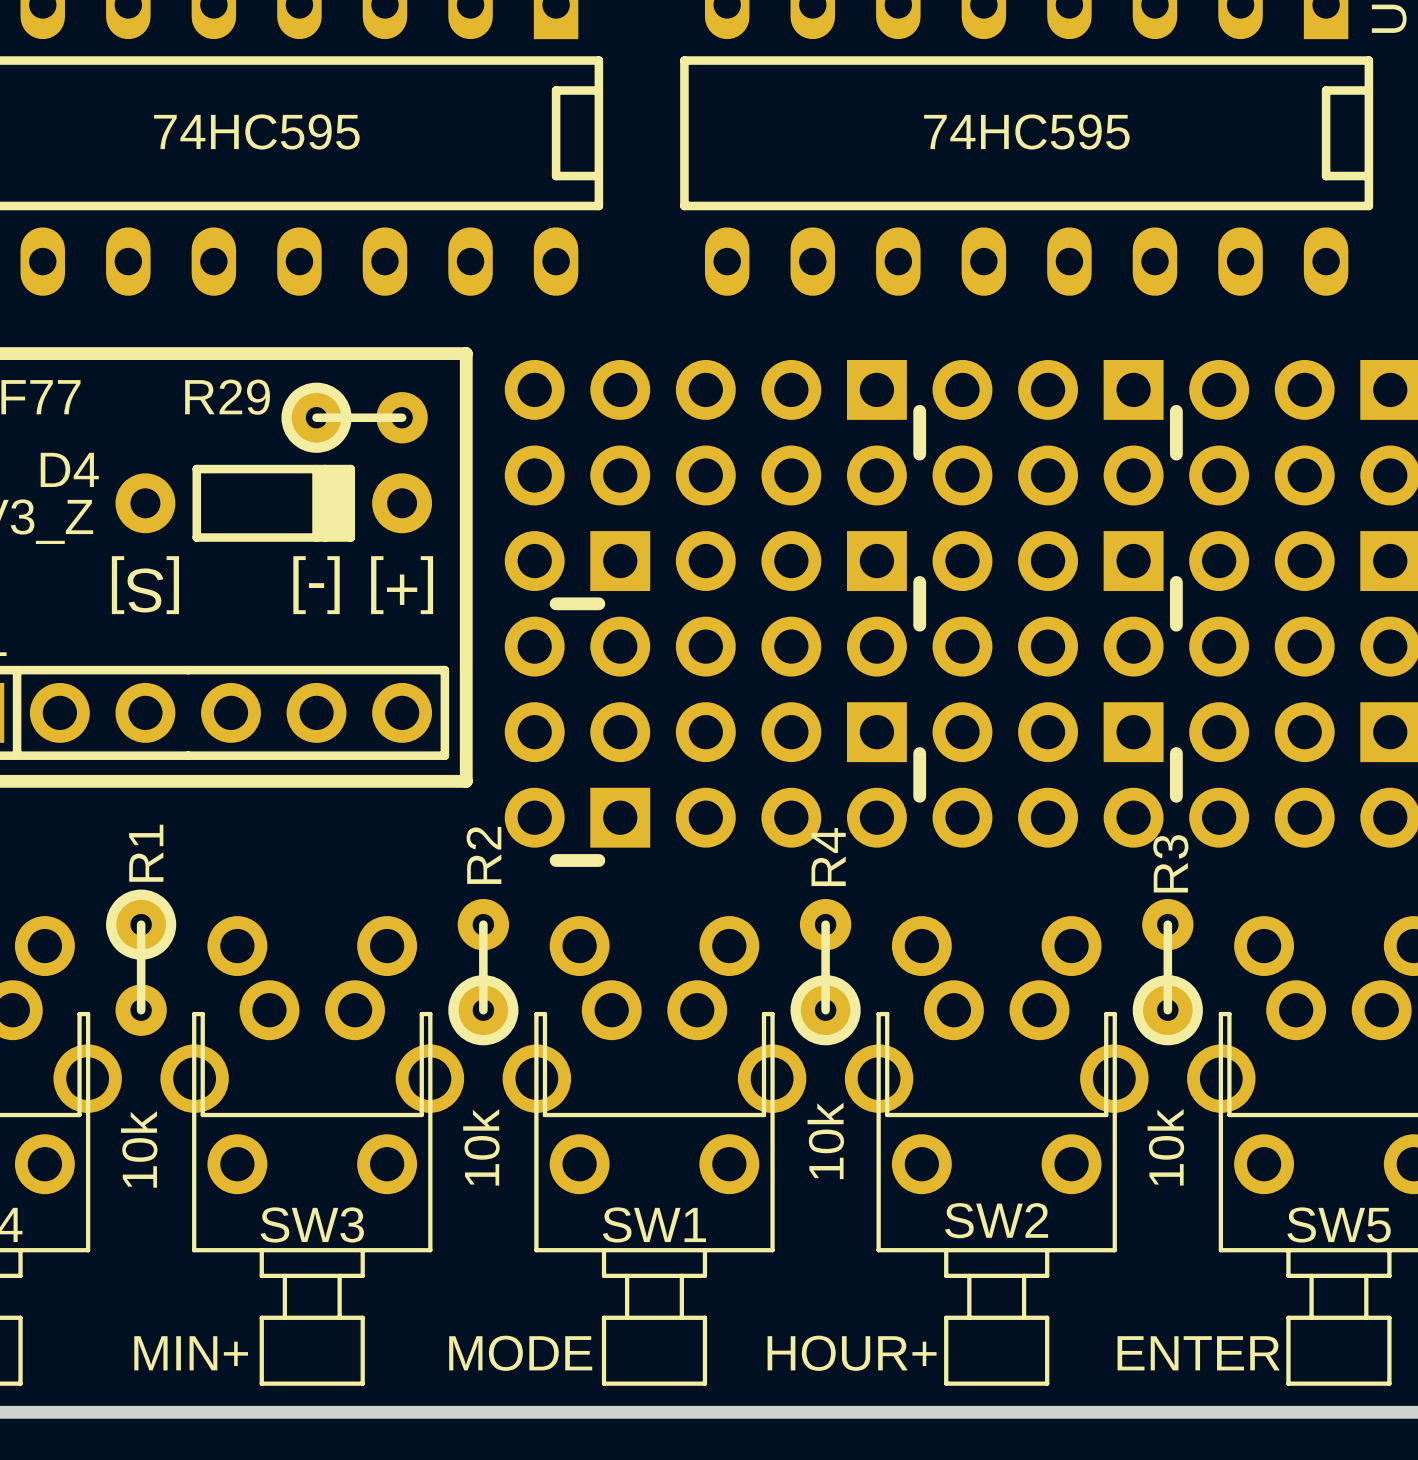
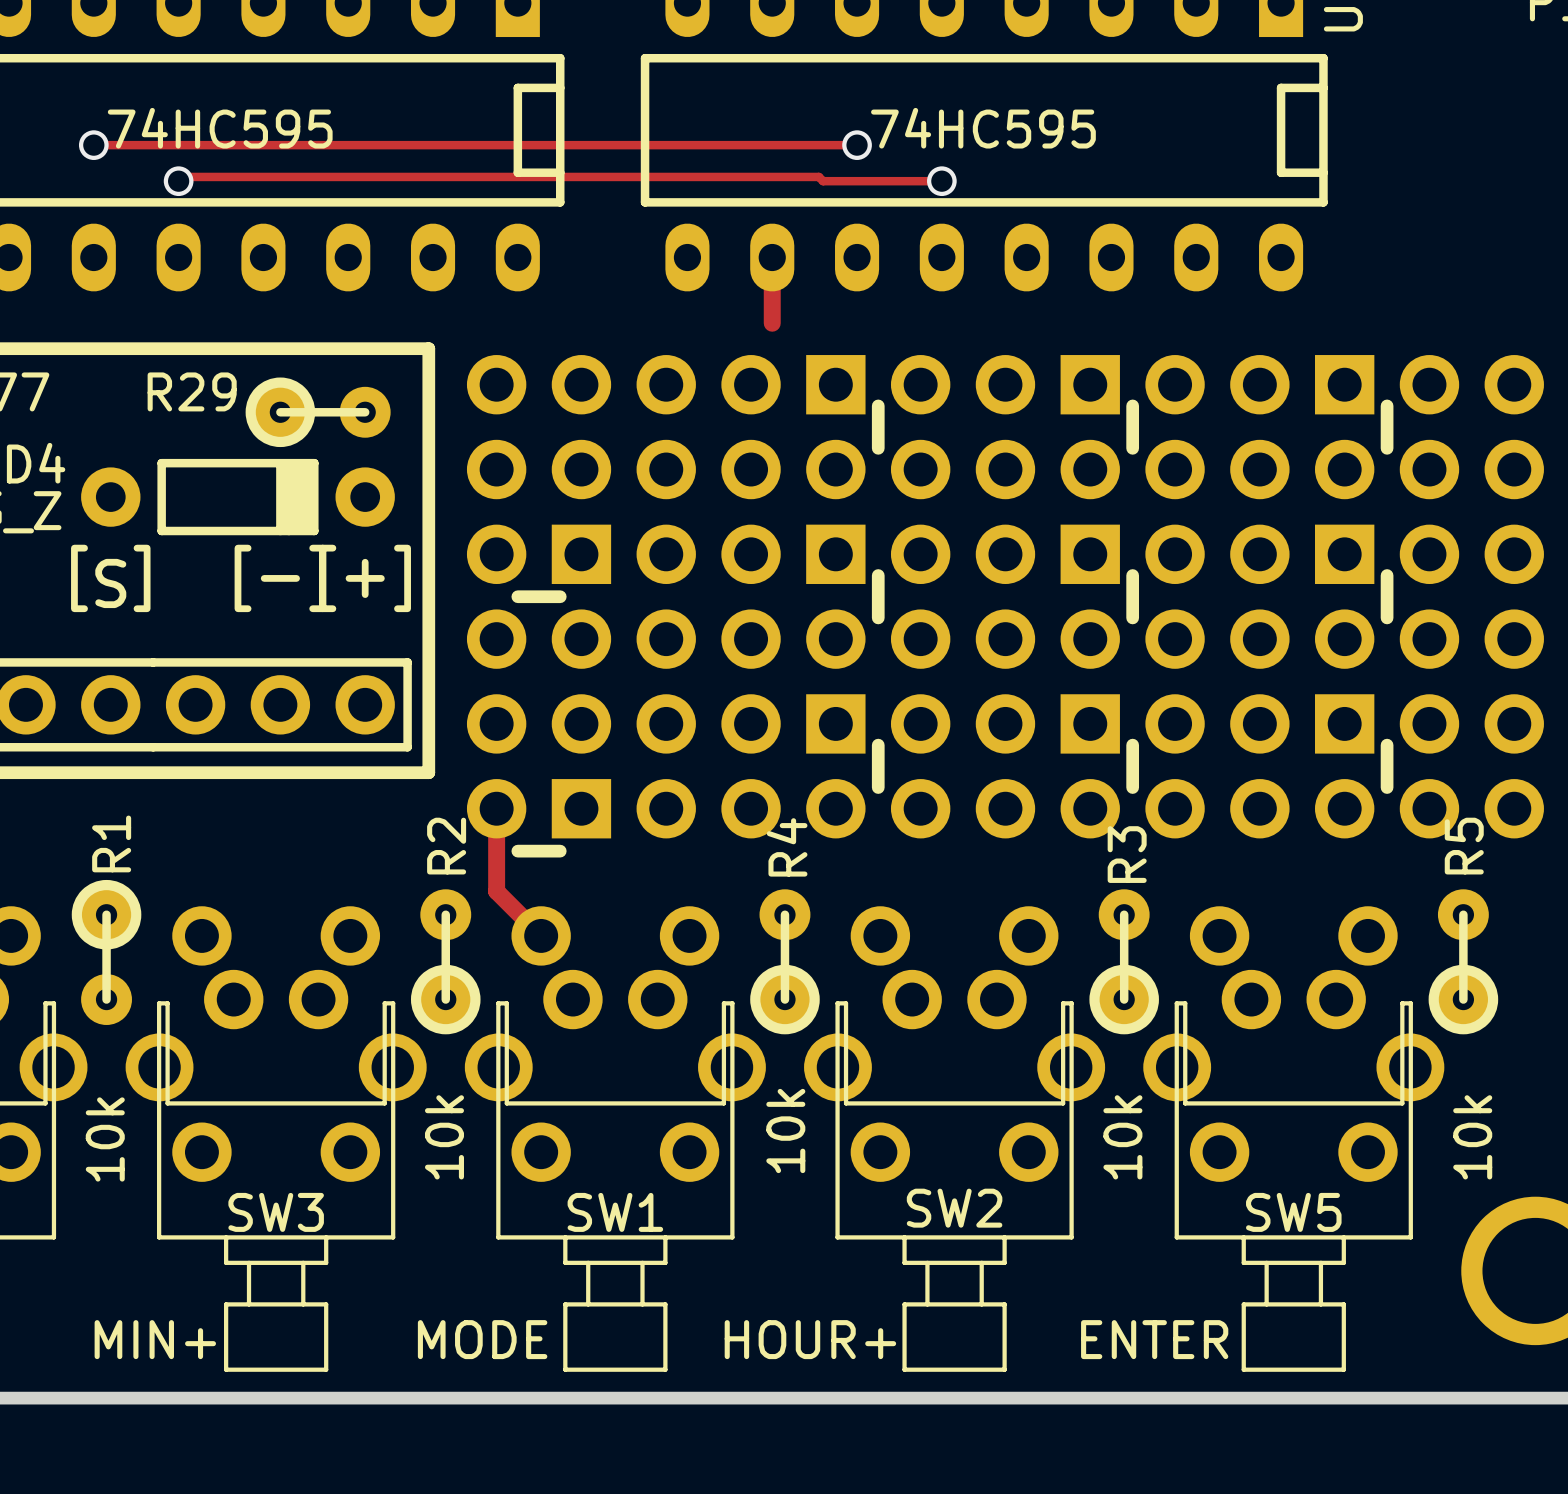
track: none -> (93, 145) (857, 145)
via: none -> (93, 145)
via: none -> (857, 145)
track: none -> (178, 181) (182, 176) (818, 176) (823, 181) (941, 181)
via: none -> (178, 181)
via: none -> (941, 181)
track: none -> (772, 257) (772, 323)
track: none -> (496, 808) (496, 891) (541, 935)

